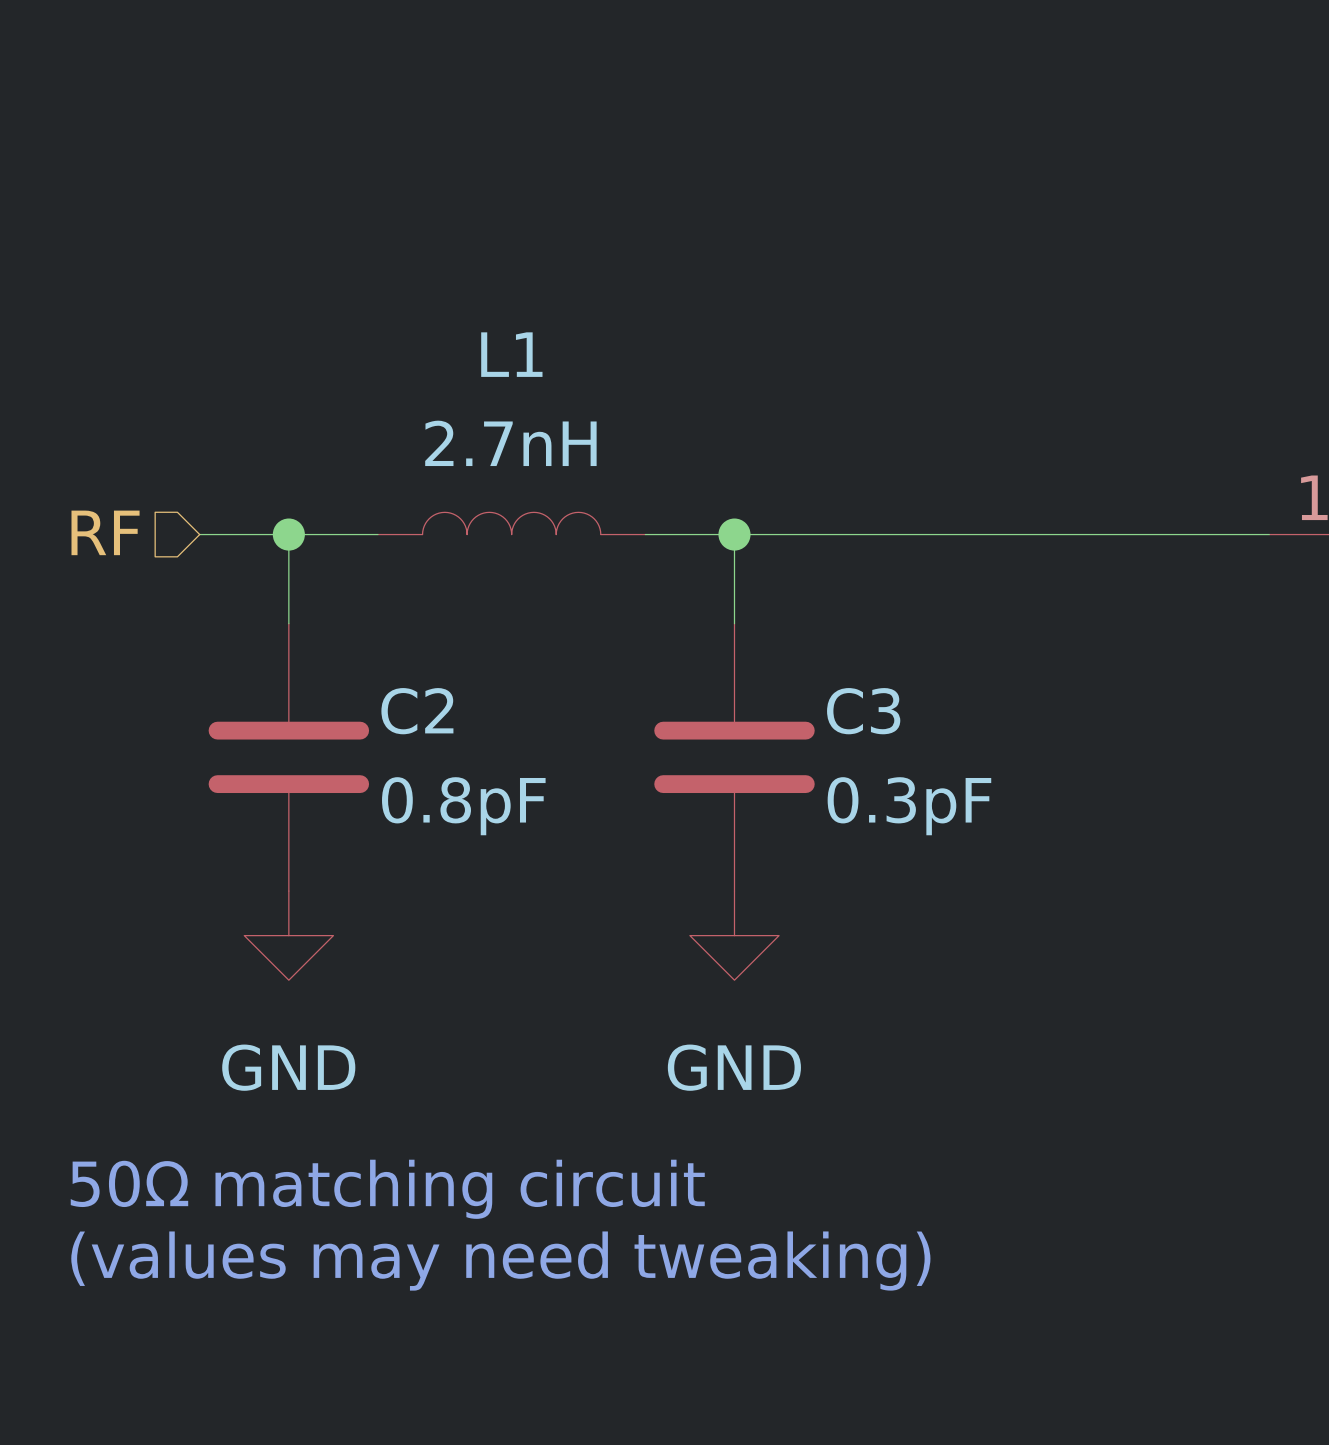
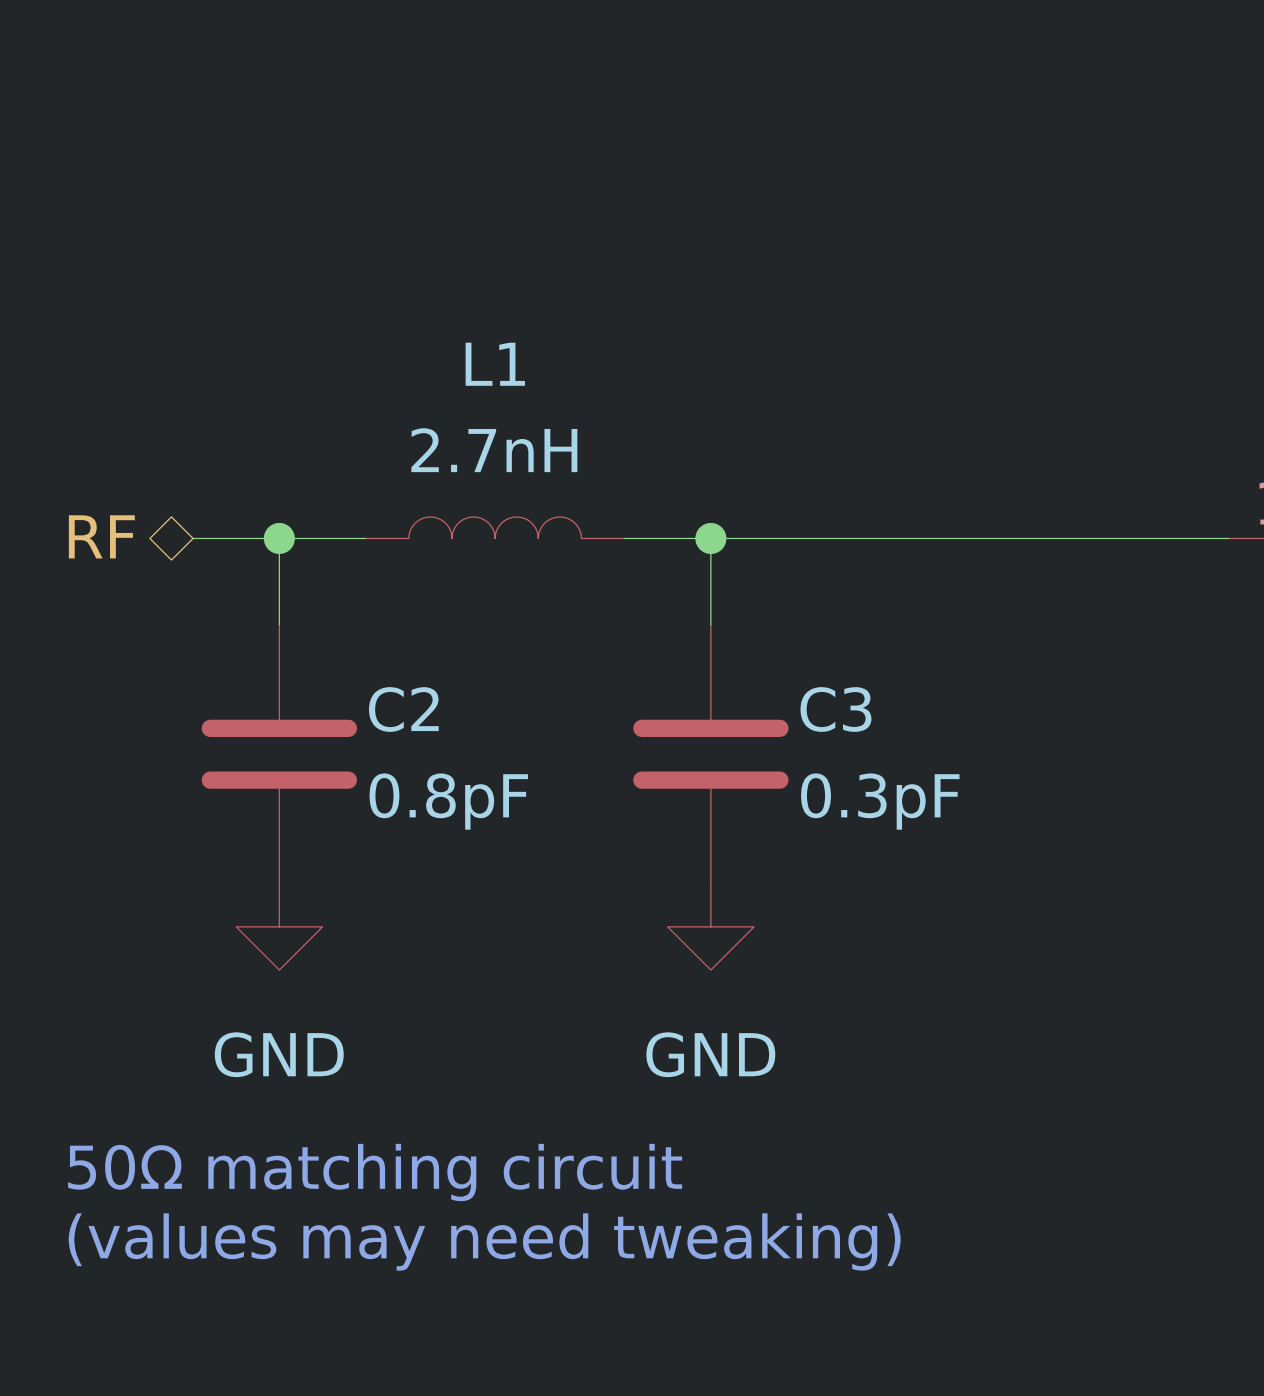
hierarchical label shape: input (105, 532) -> bidirectional (101, 536)

